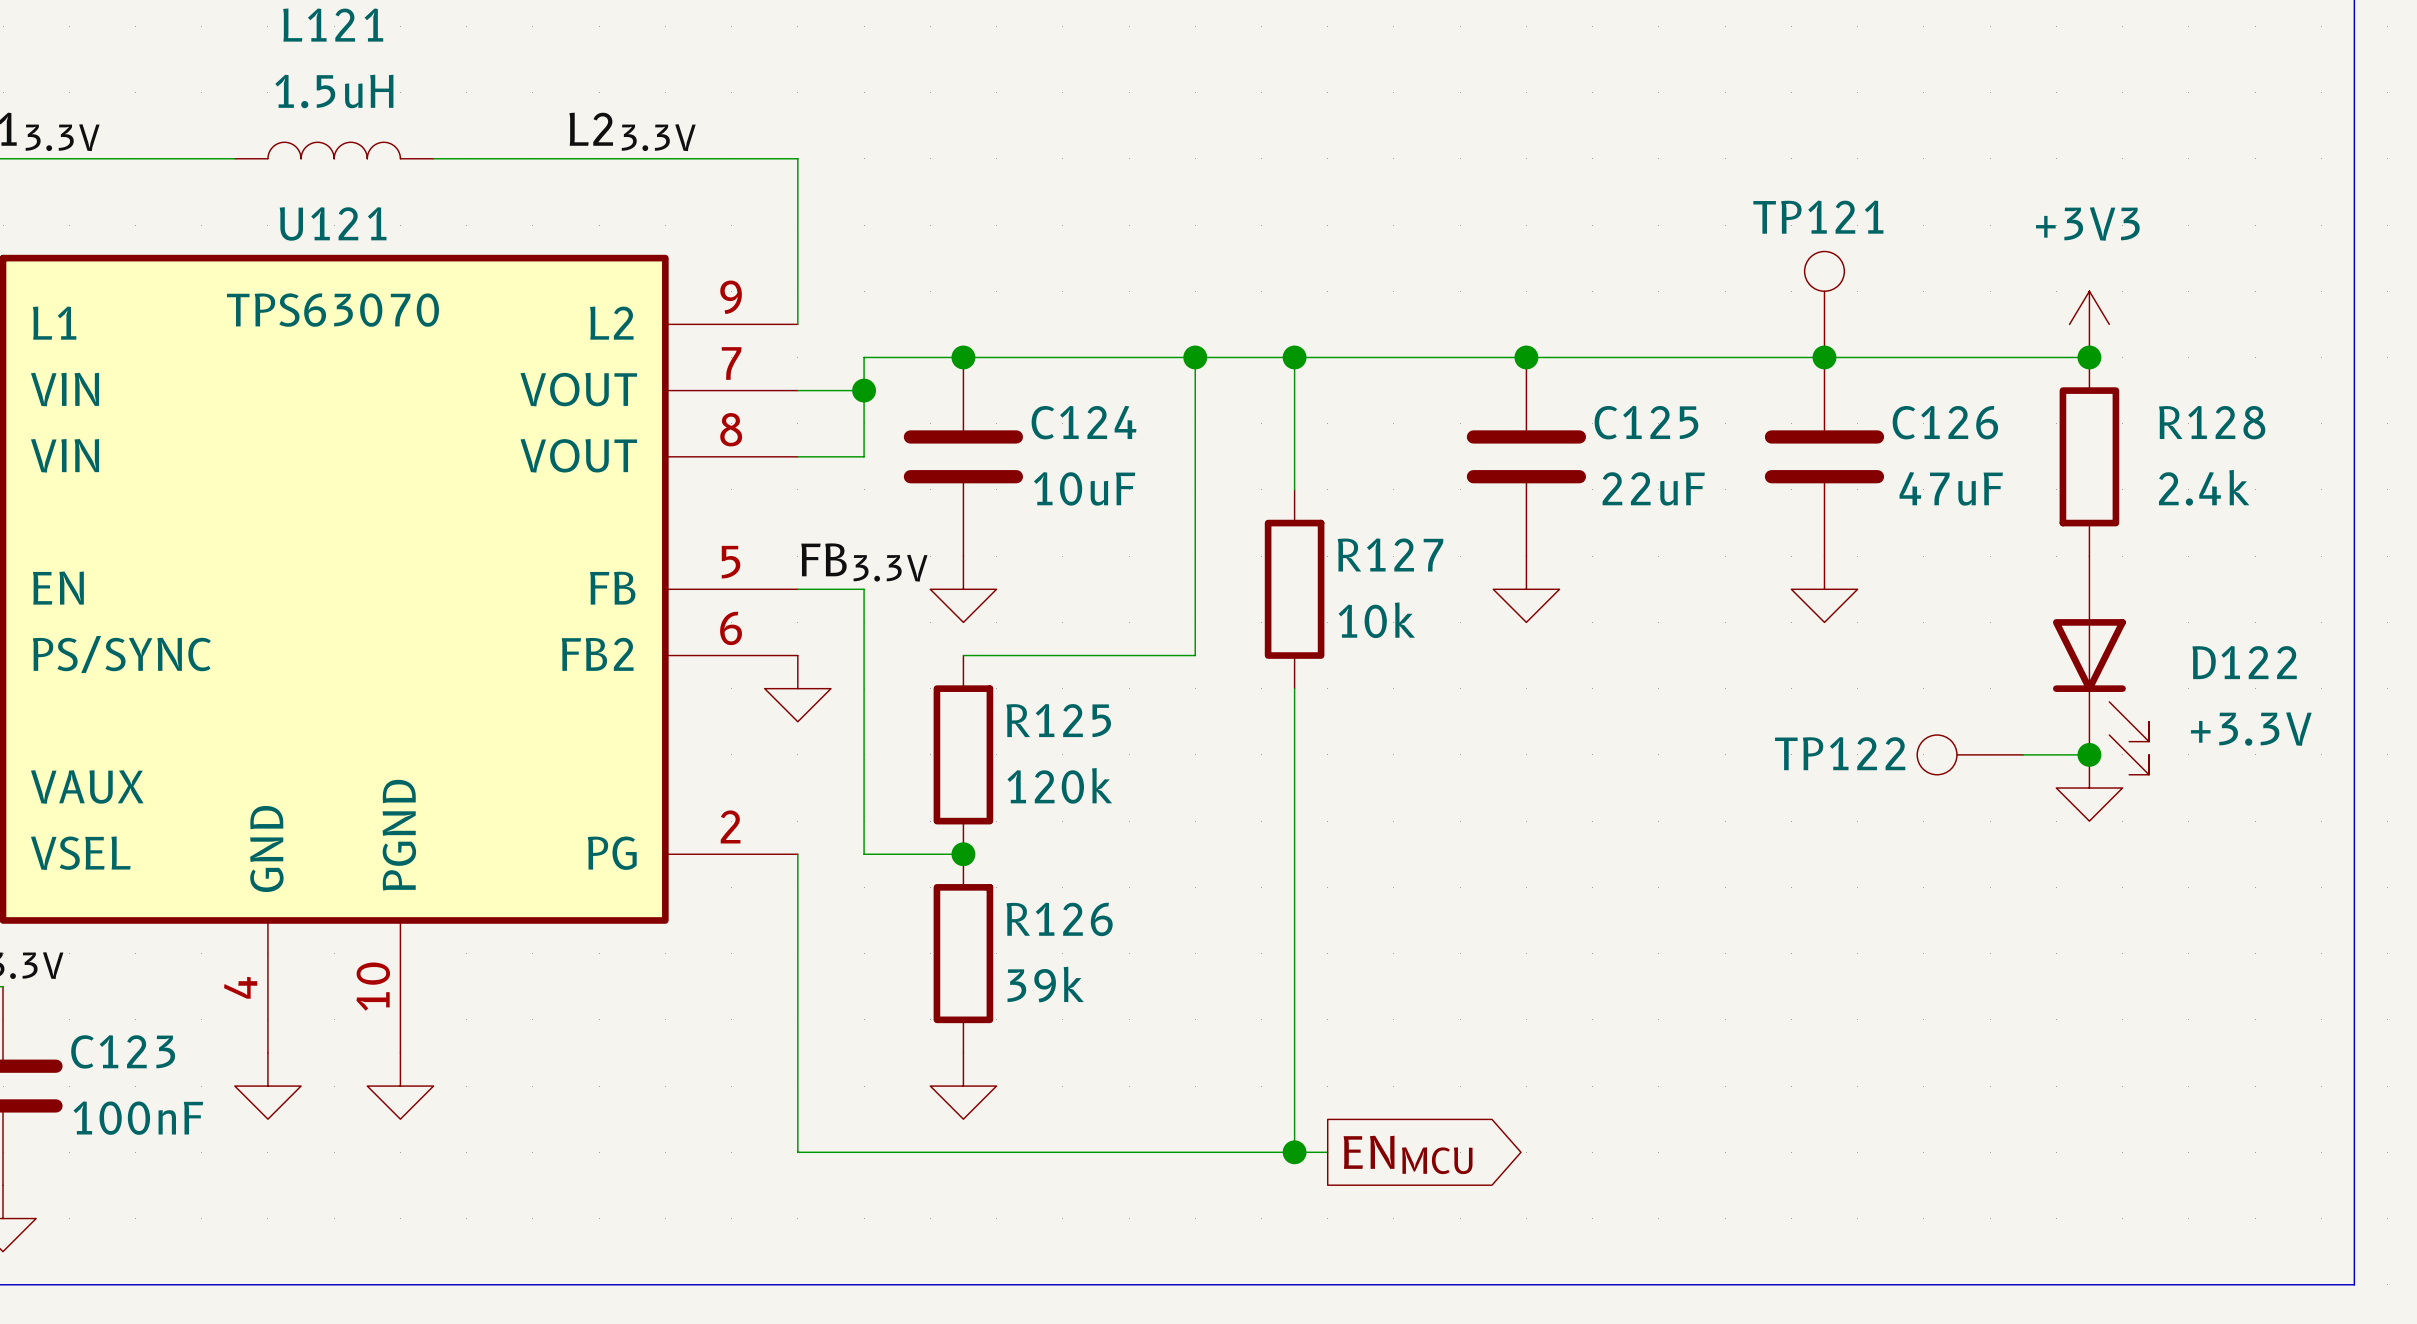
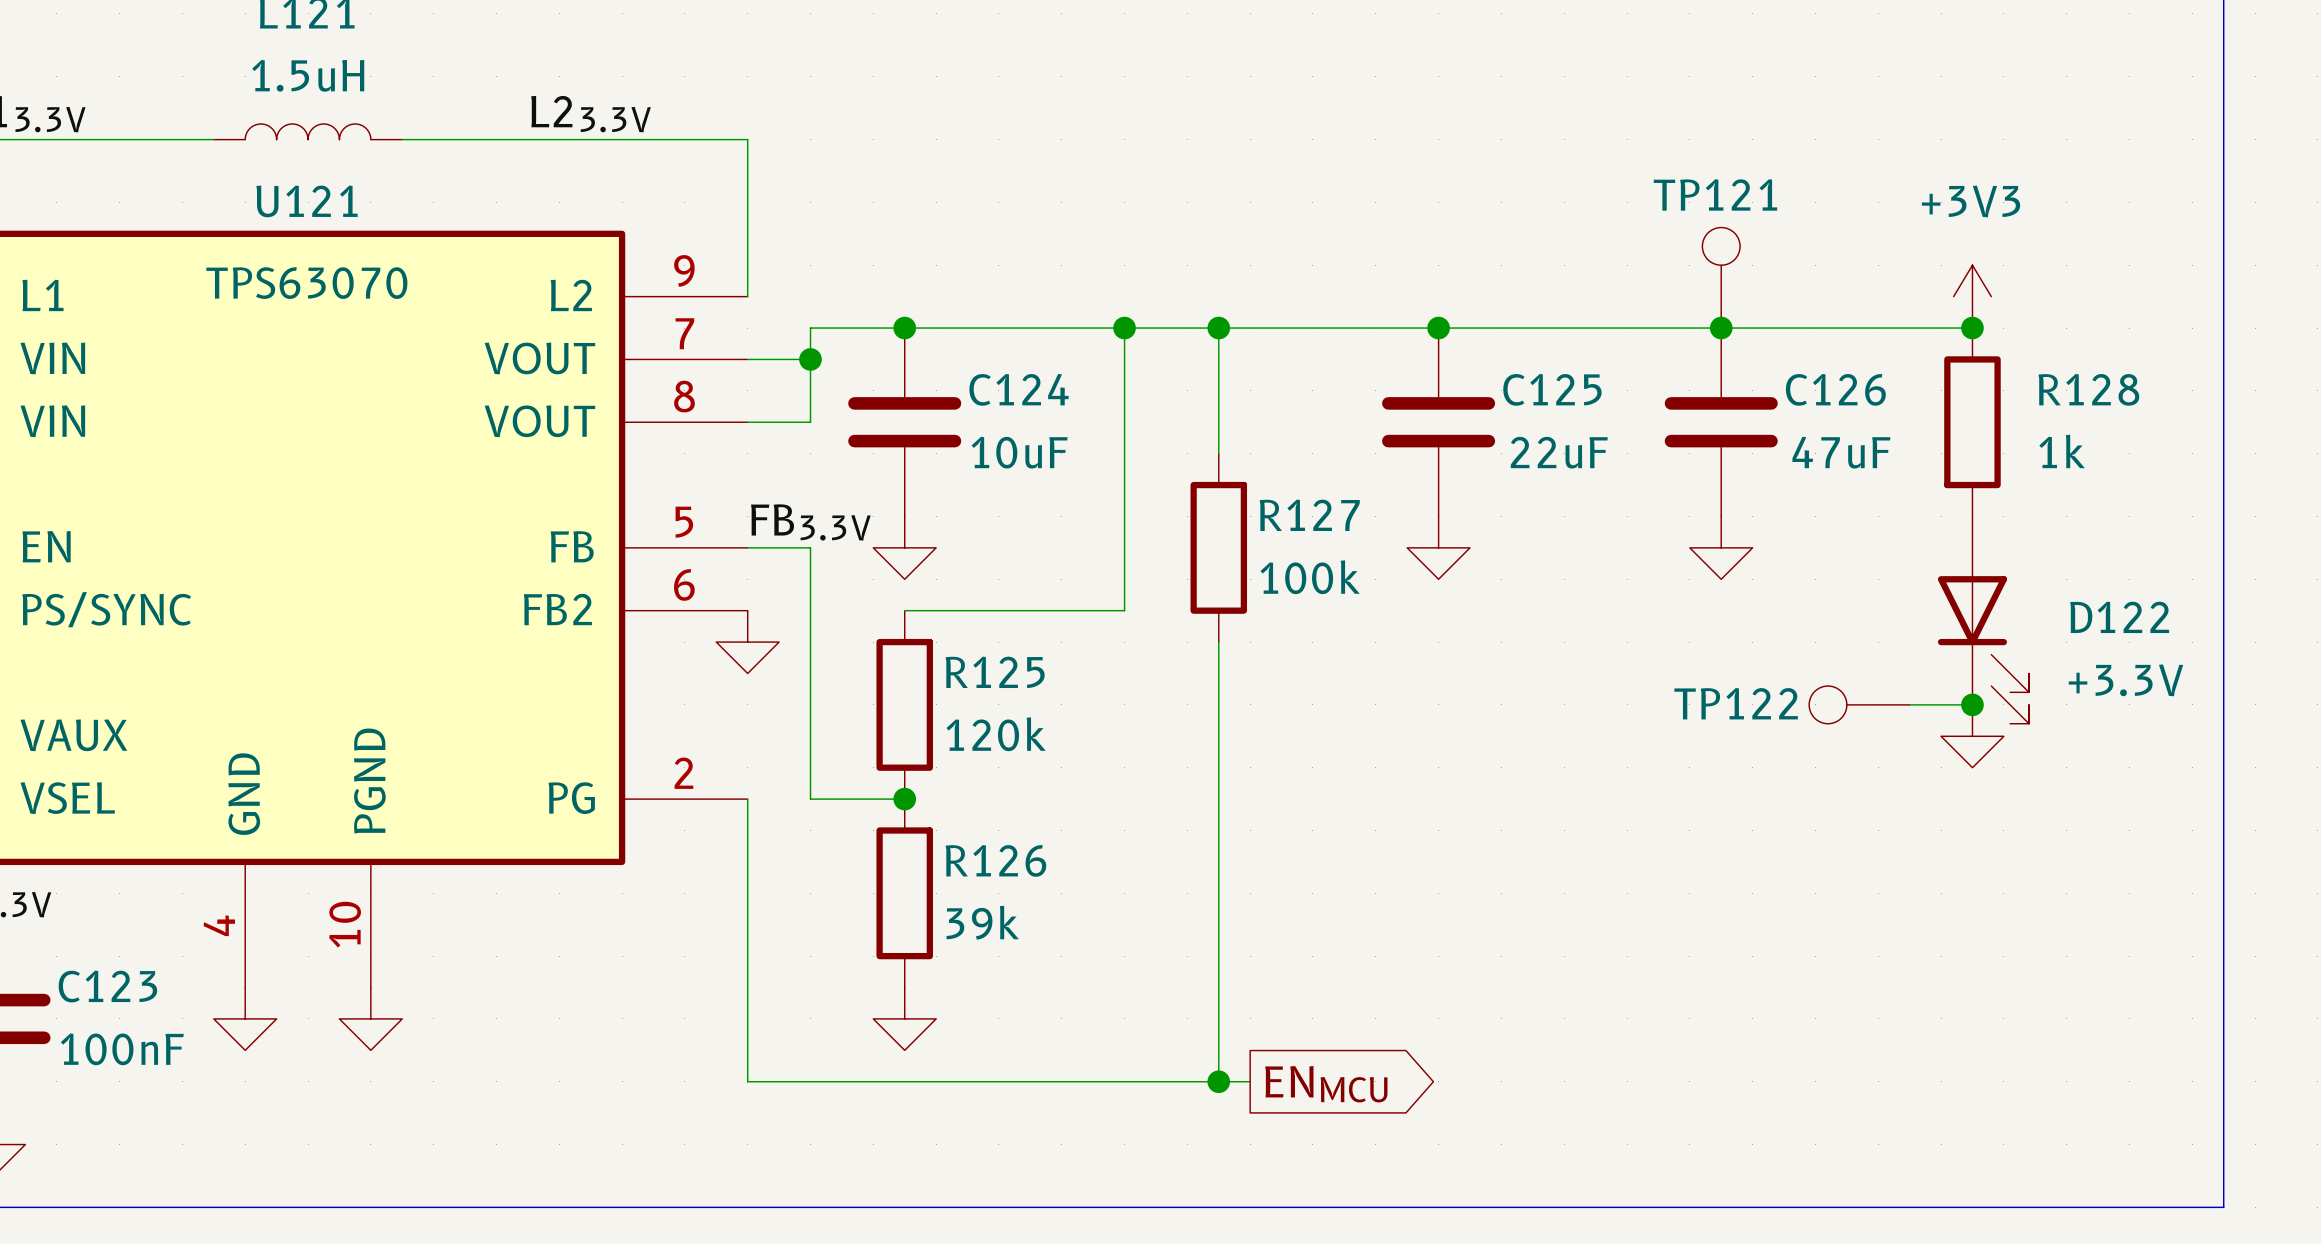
R128 value: 2.4k (2204, 487) -> 1k (2062, 451)
R127 value: 10k (1376, 620) -> 100k (1310, 577)

